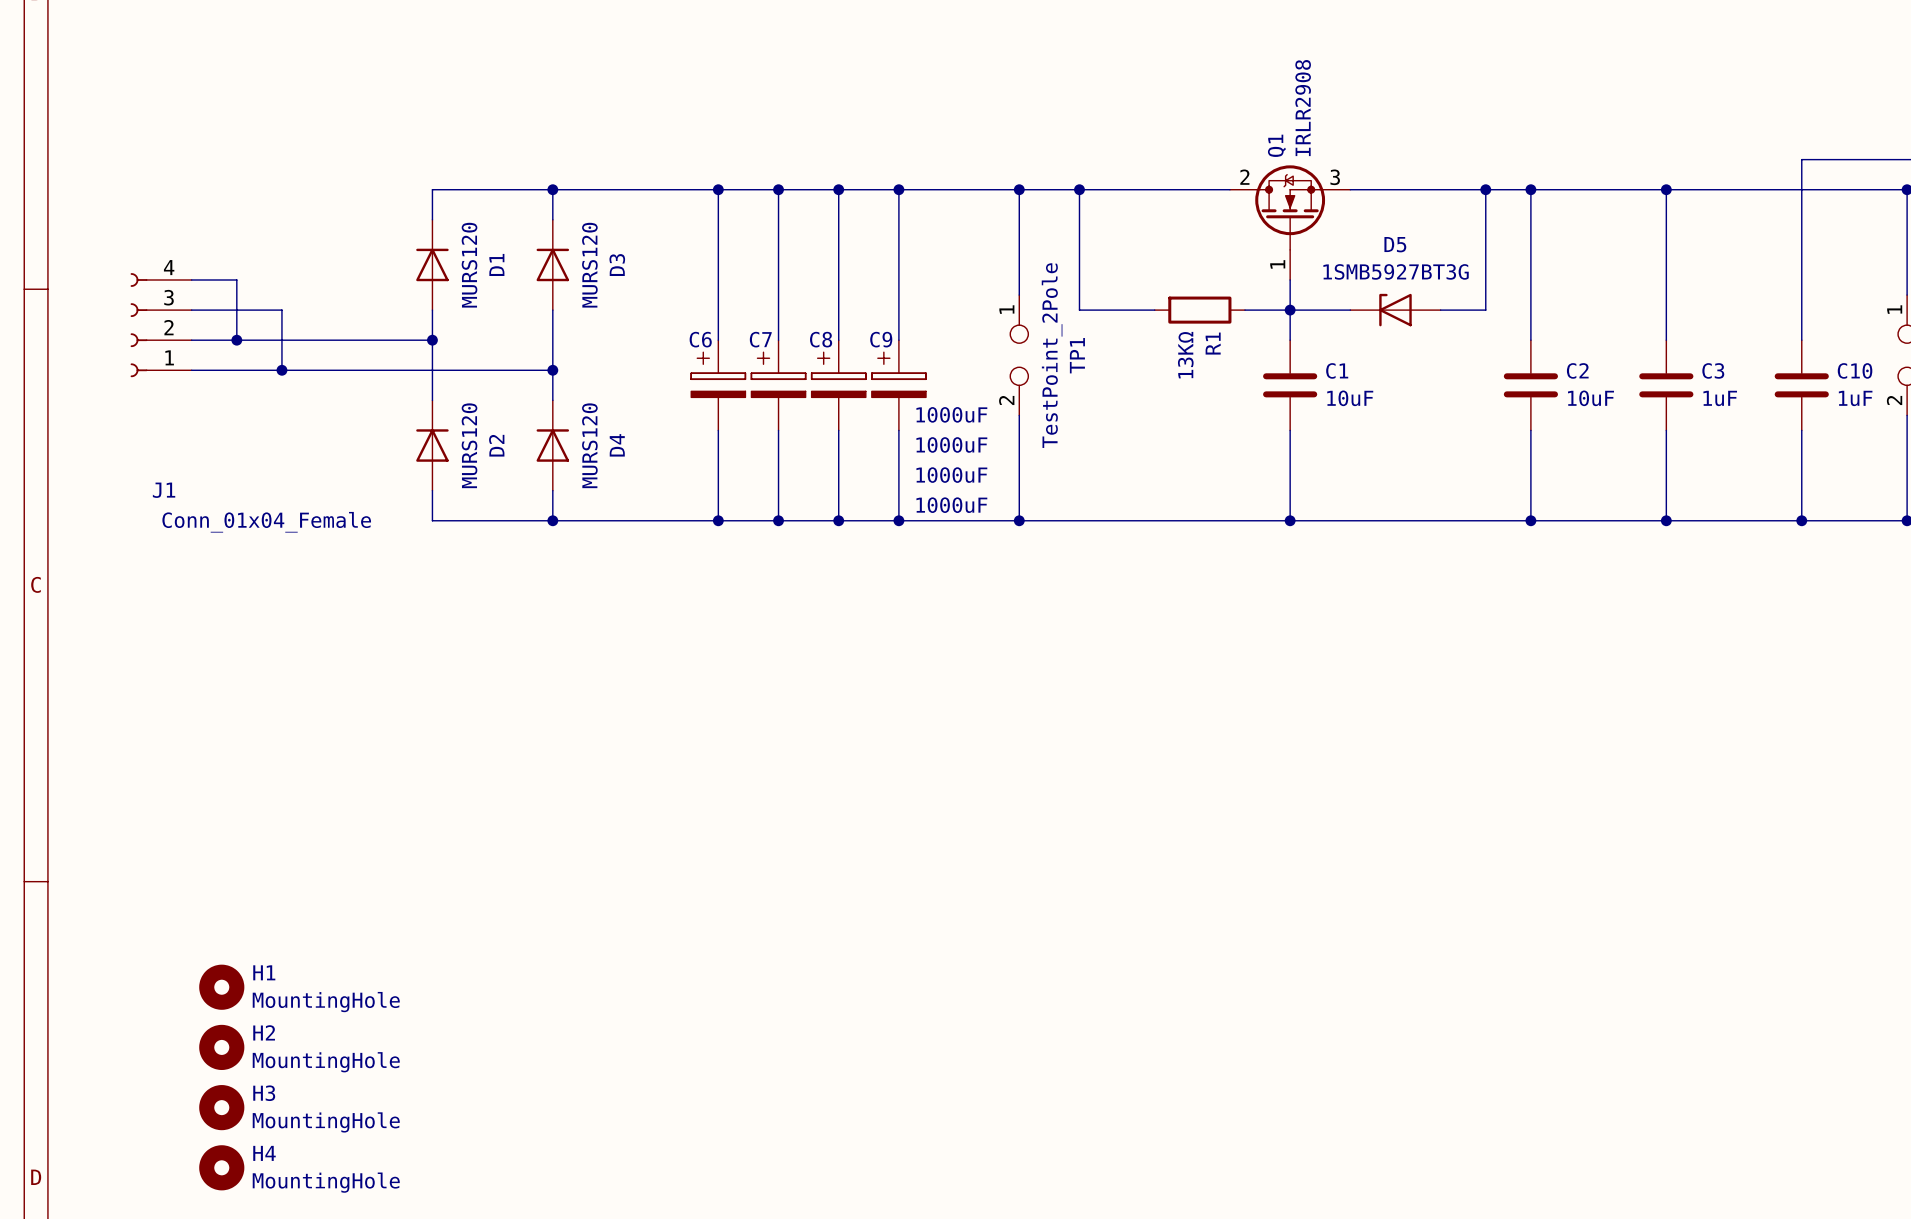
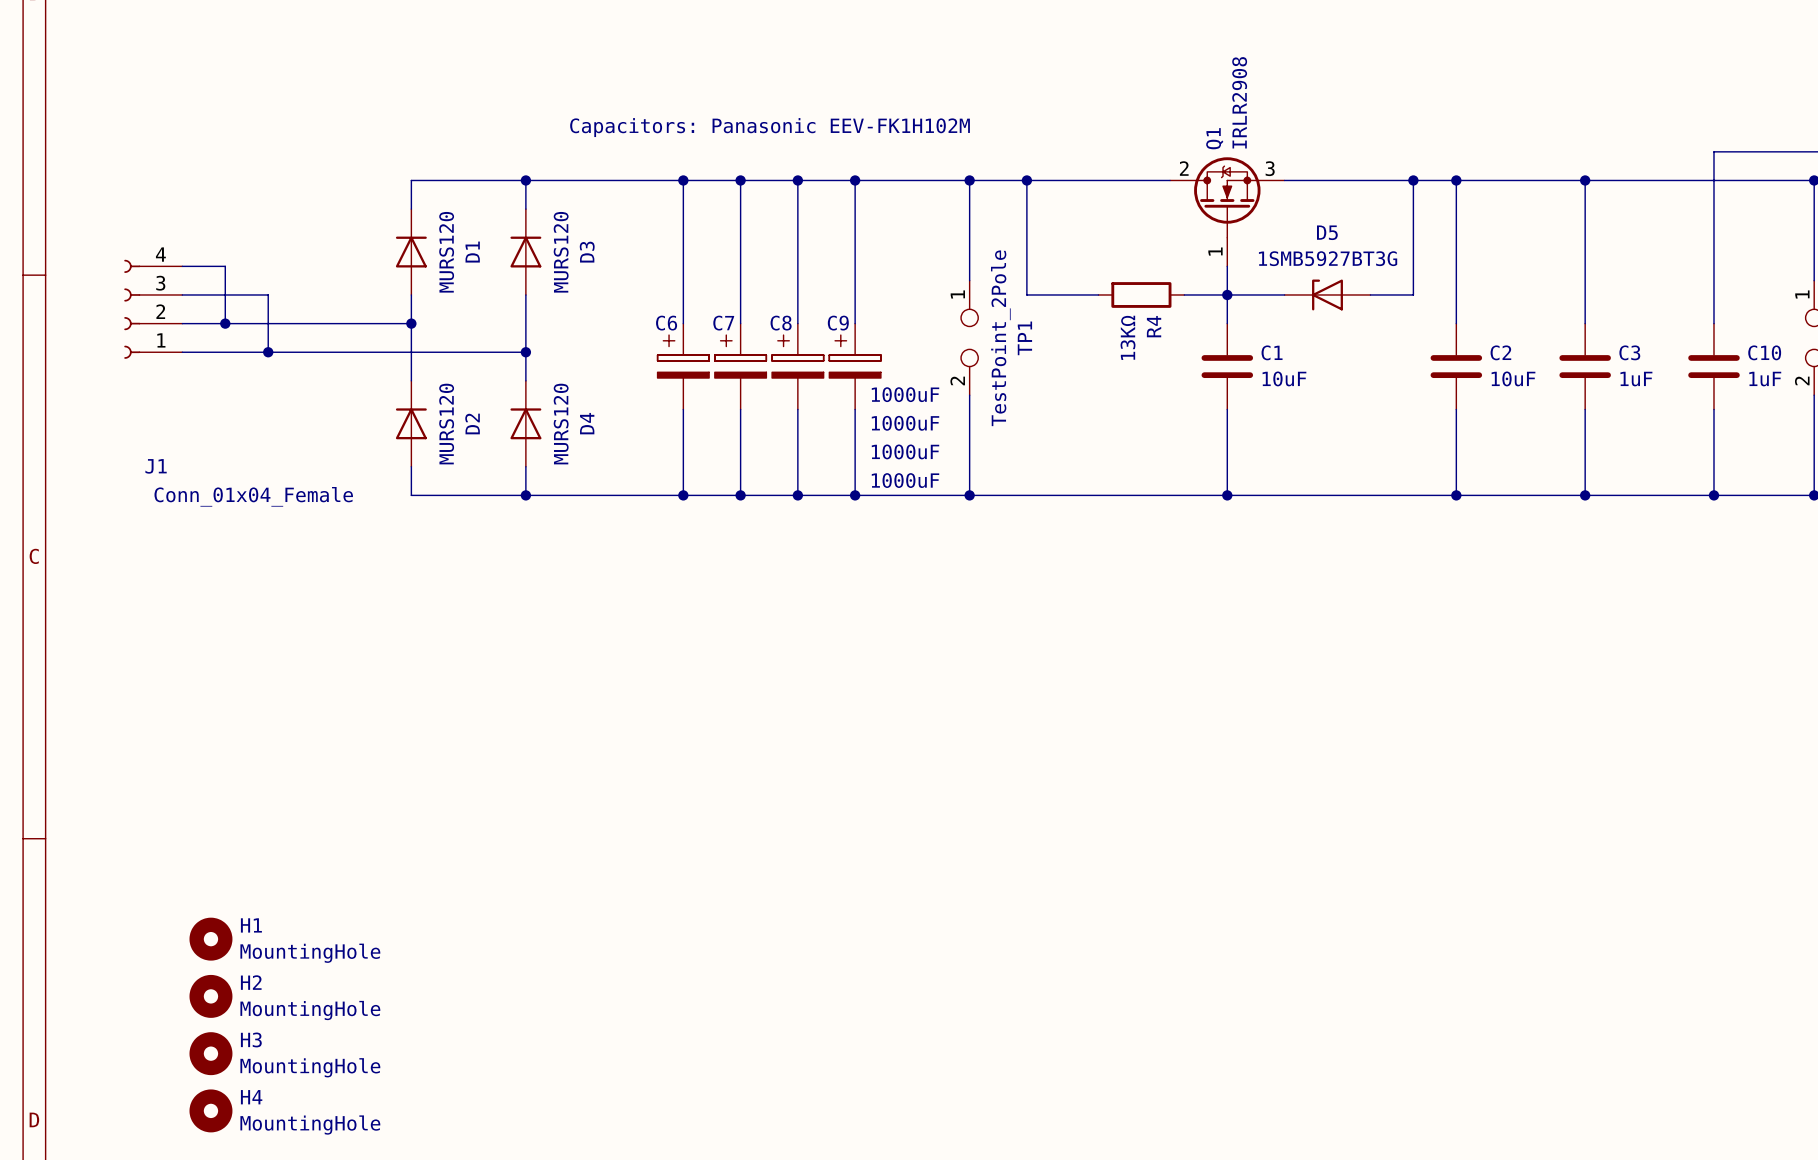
text: none -> Capacitors: Panasonic EEV-FK1H102M (770, 127)
R1 name: R1 (1213, 343) -> R4 (1154, 326)

